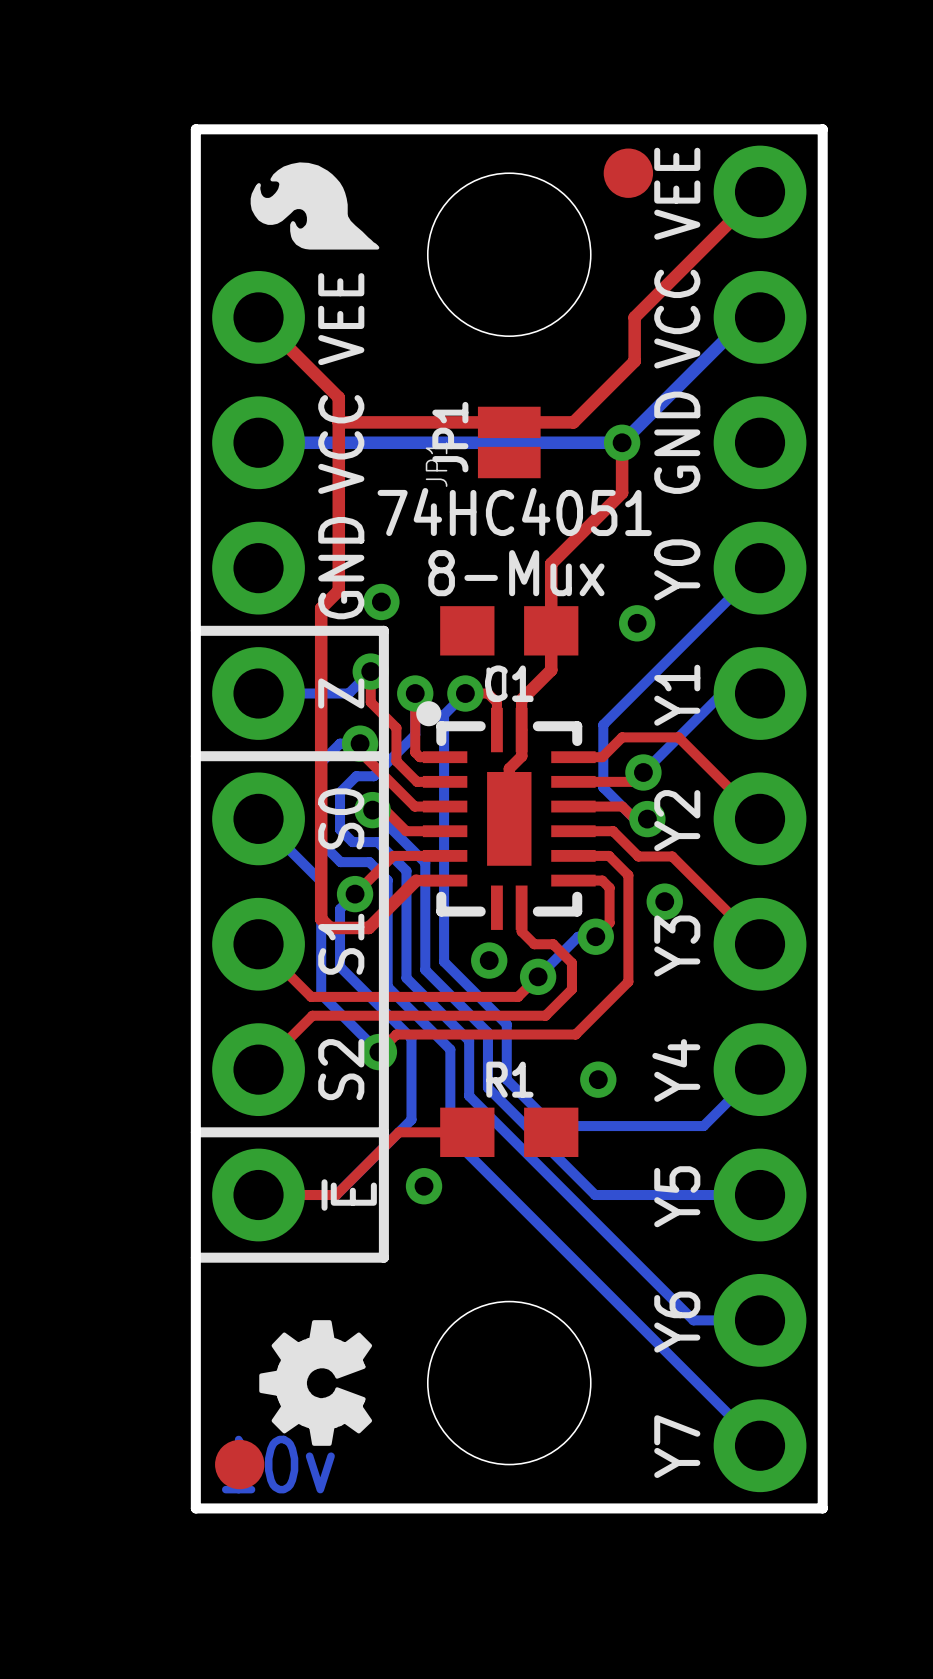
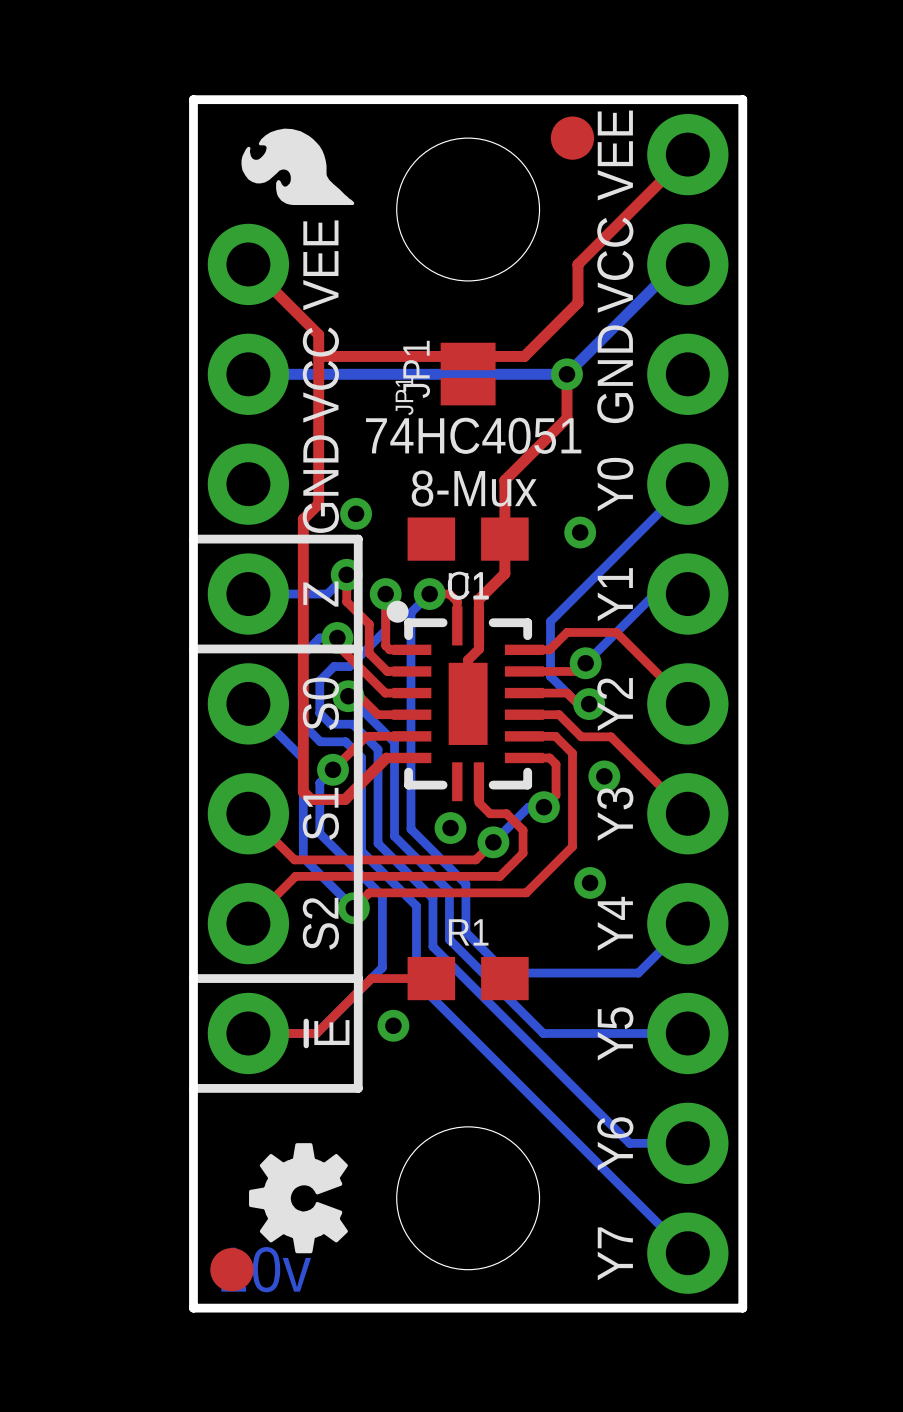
via position: (598, 1079) -> (590, 882)

